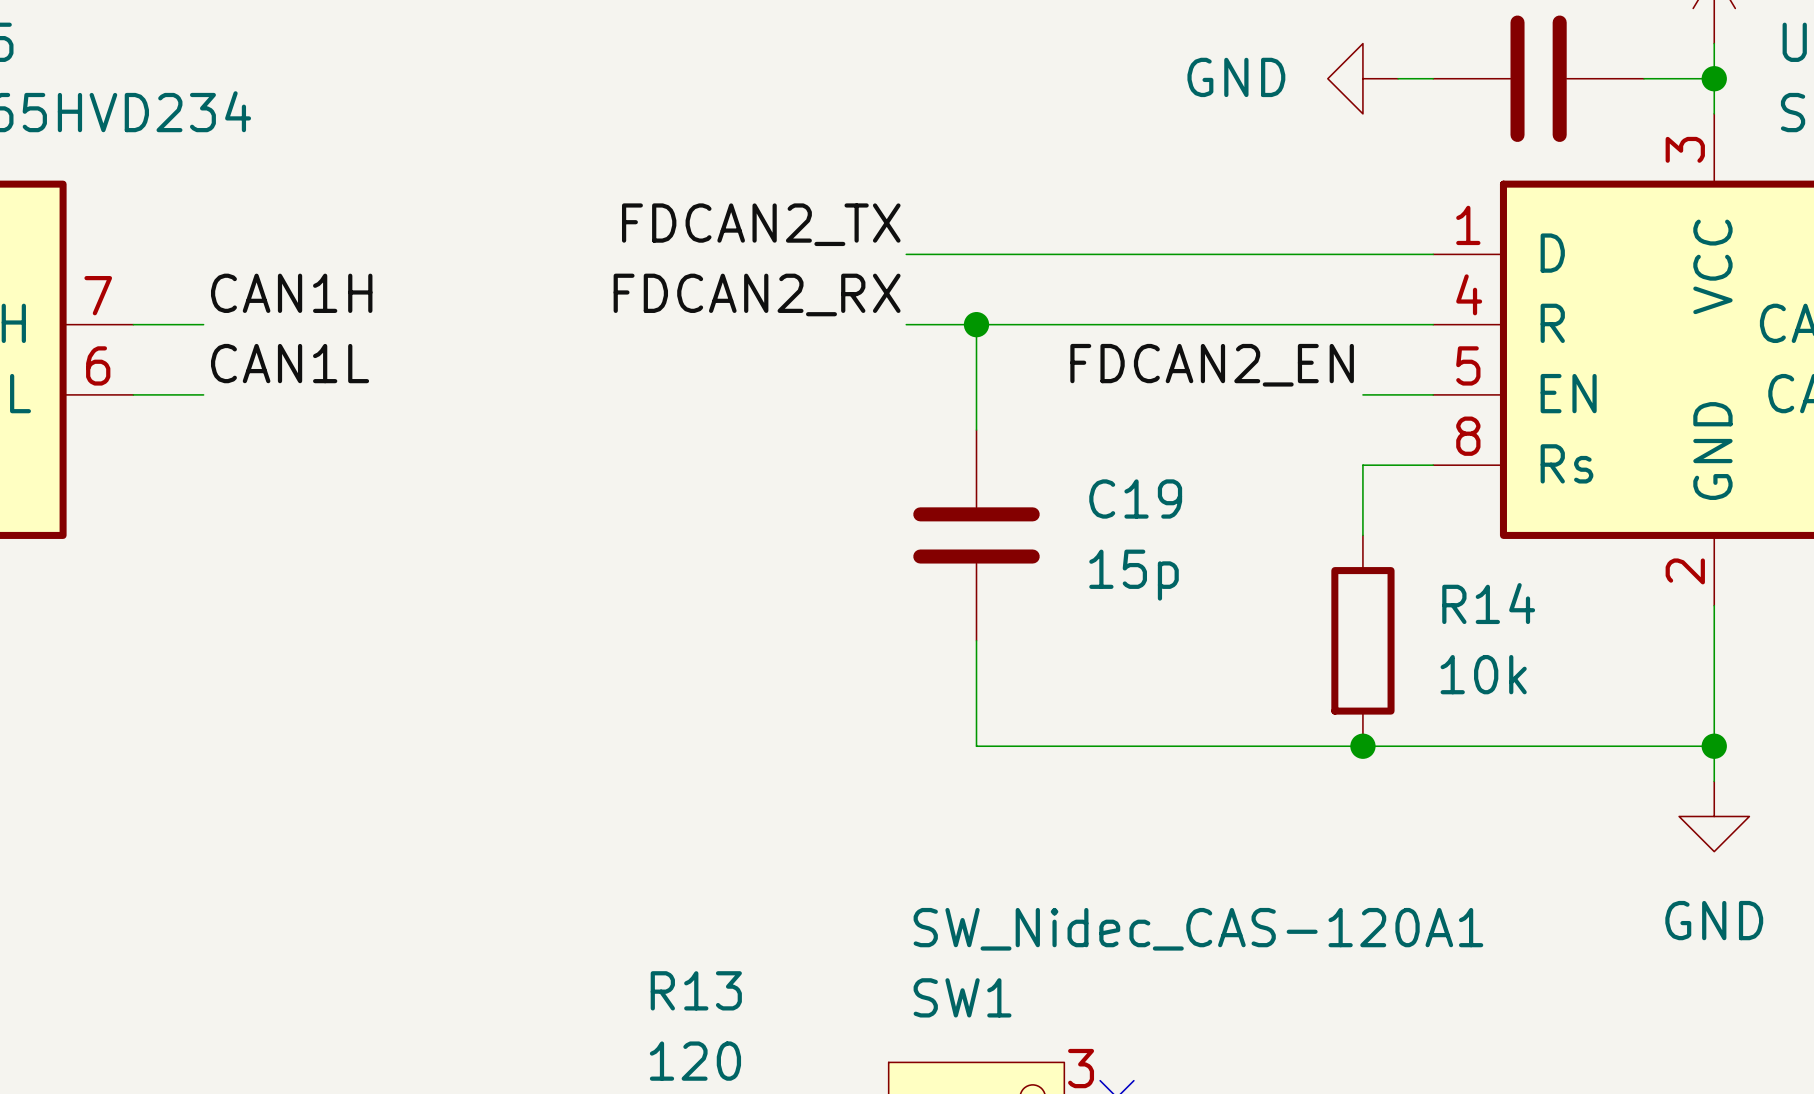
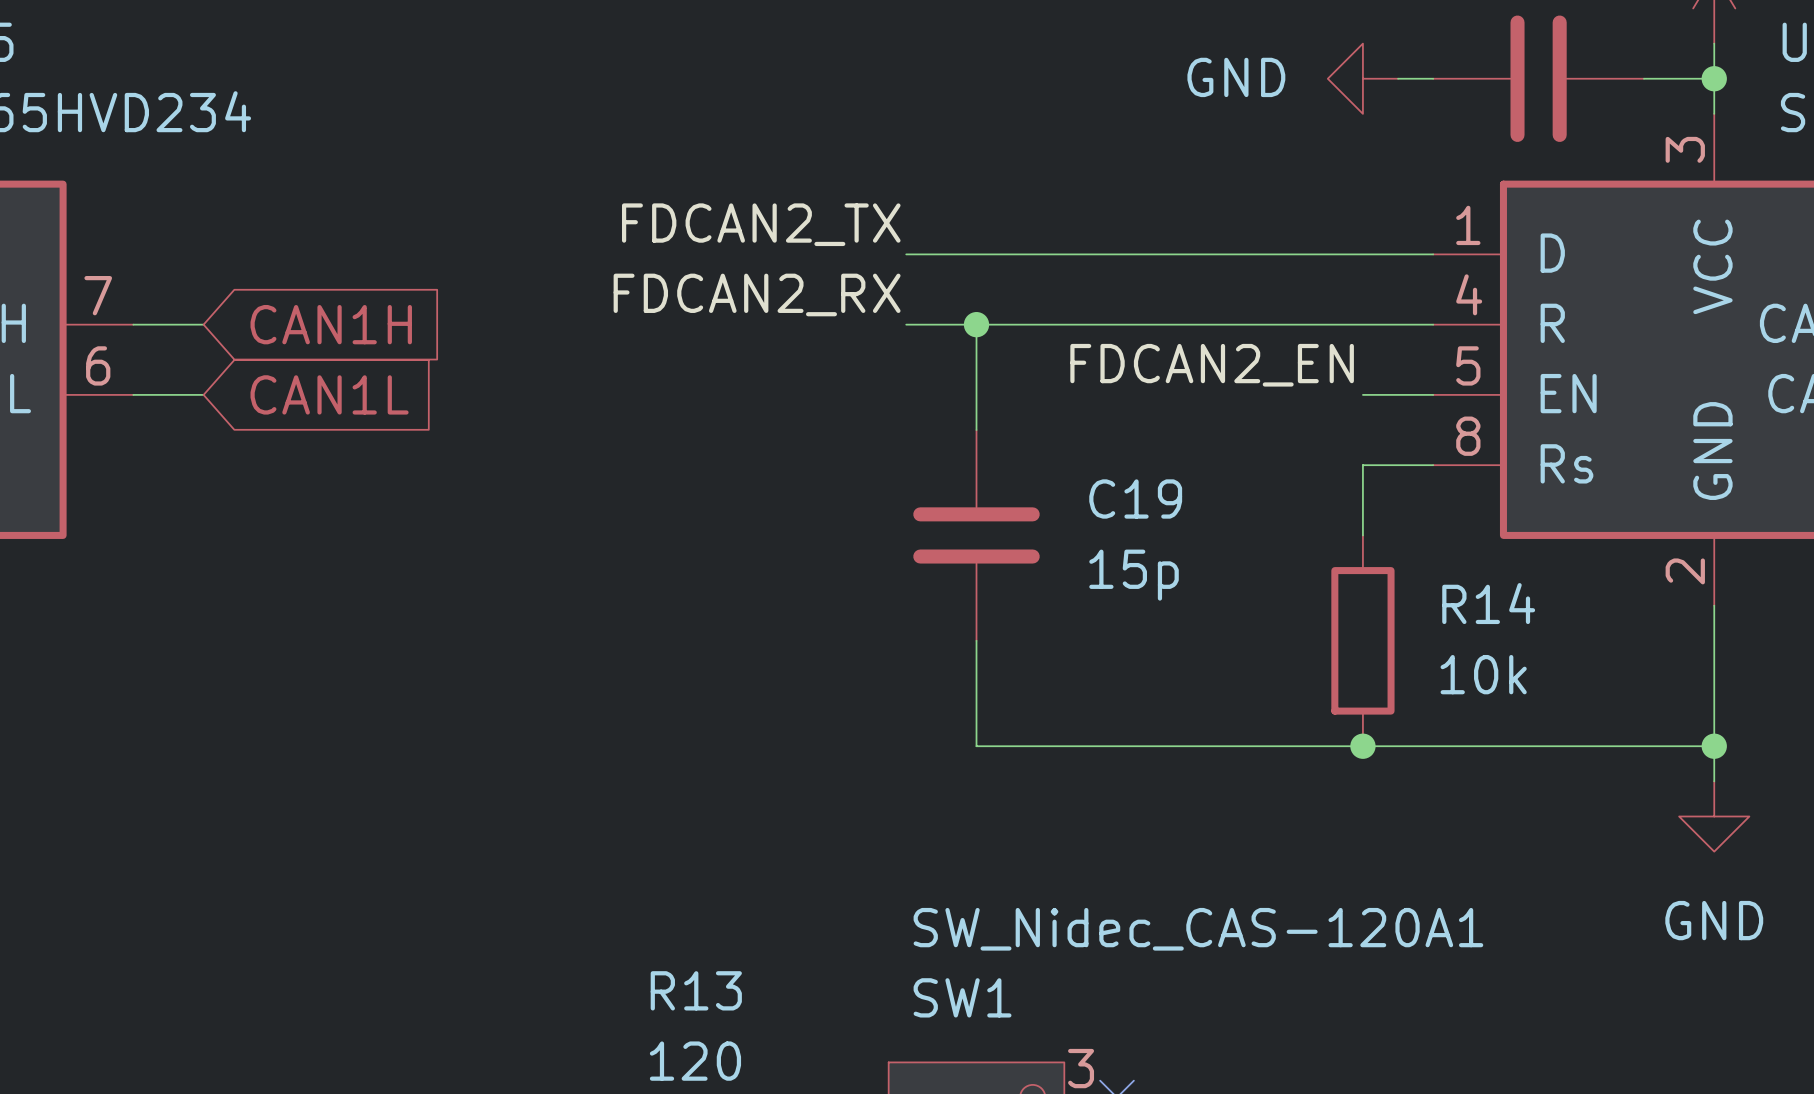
label: CAN1H (291, 293) -> none
global label: none -> CAN1H (331, 324)
label: CAN1L (290, 363) -> none
global label: none -> CAN1L (329, 394)

